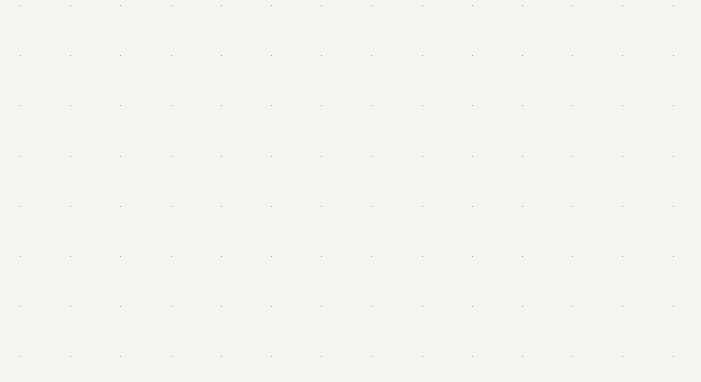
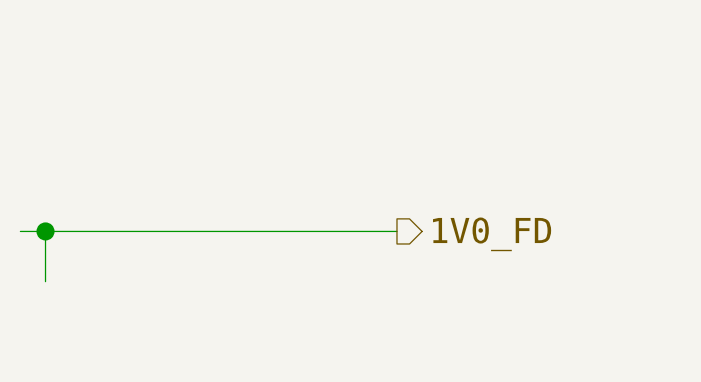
wire: none -> (20, 231) (396, 231)
wire: none -> (45, 231) (45, 281)
junction: none -> (45, 231)
hierarchical label: none -> 1V0_FD (492, 234)

